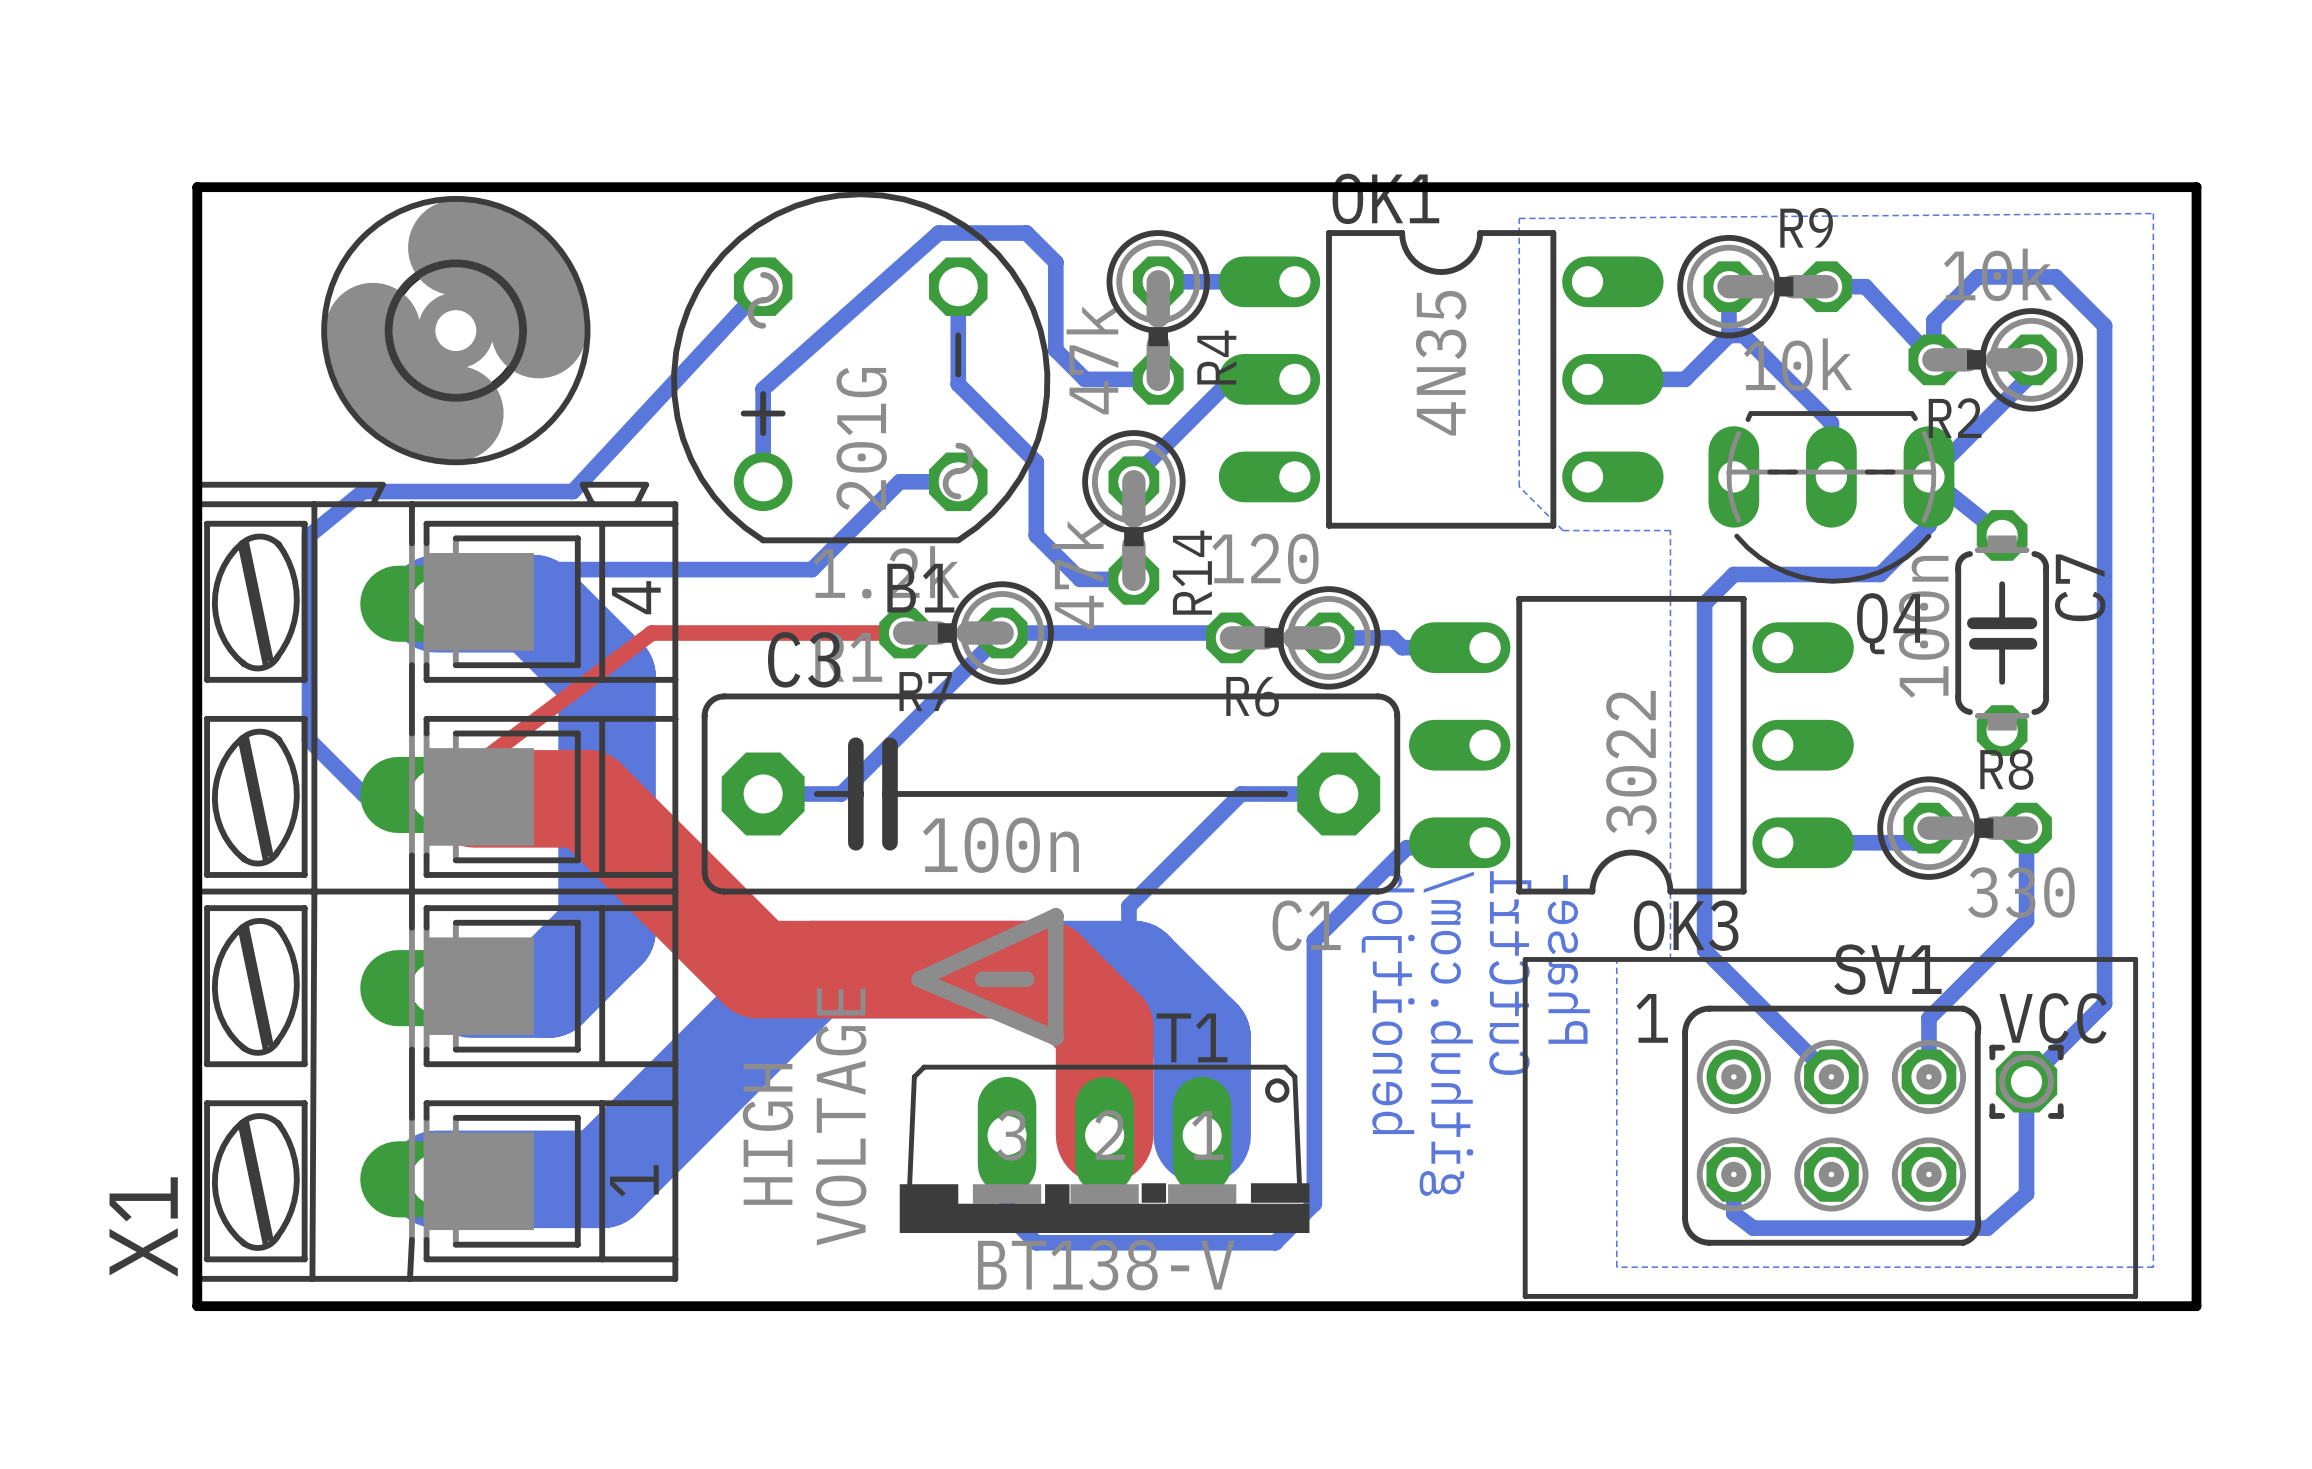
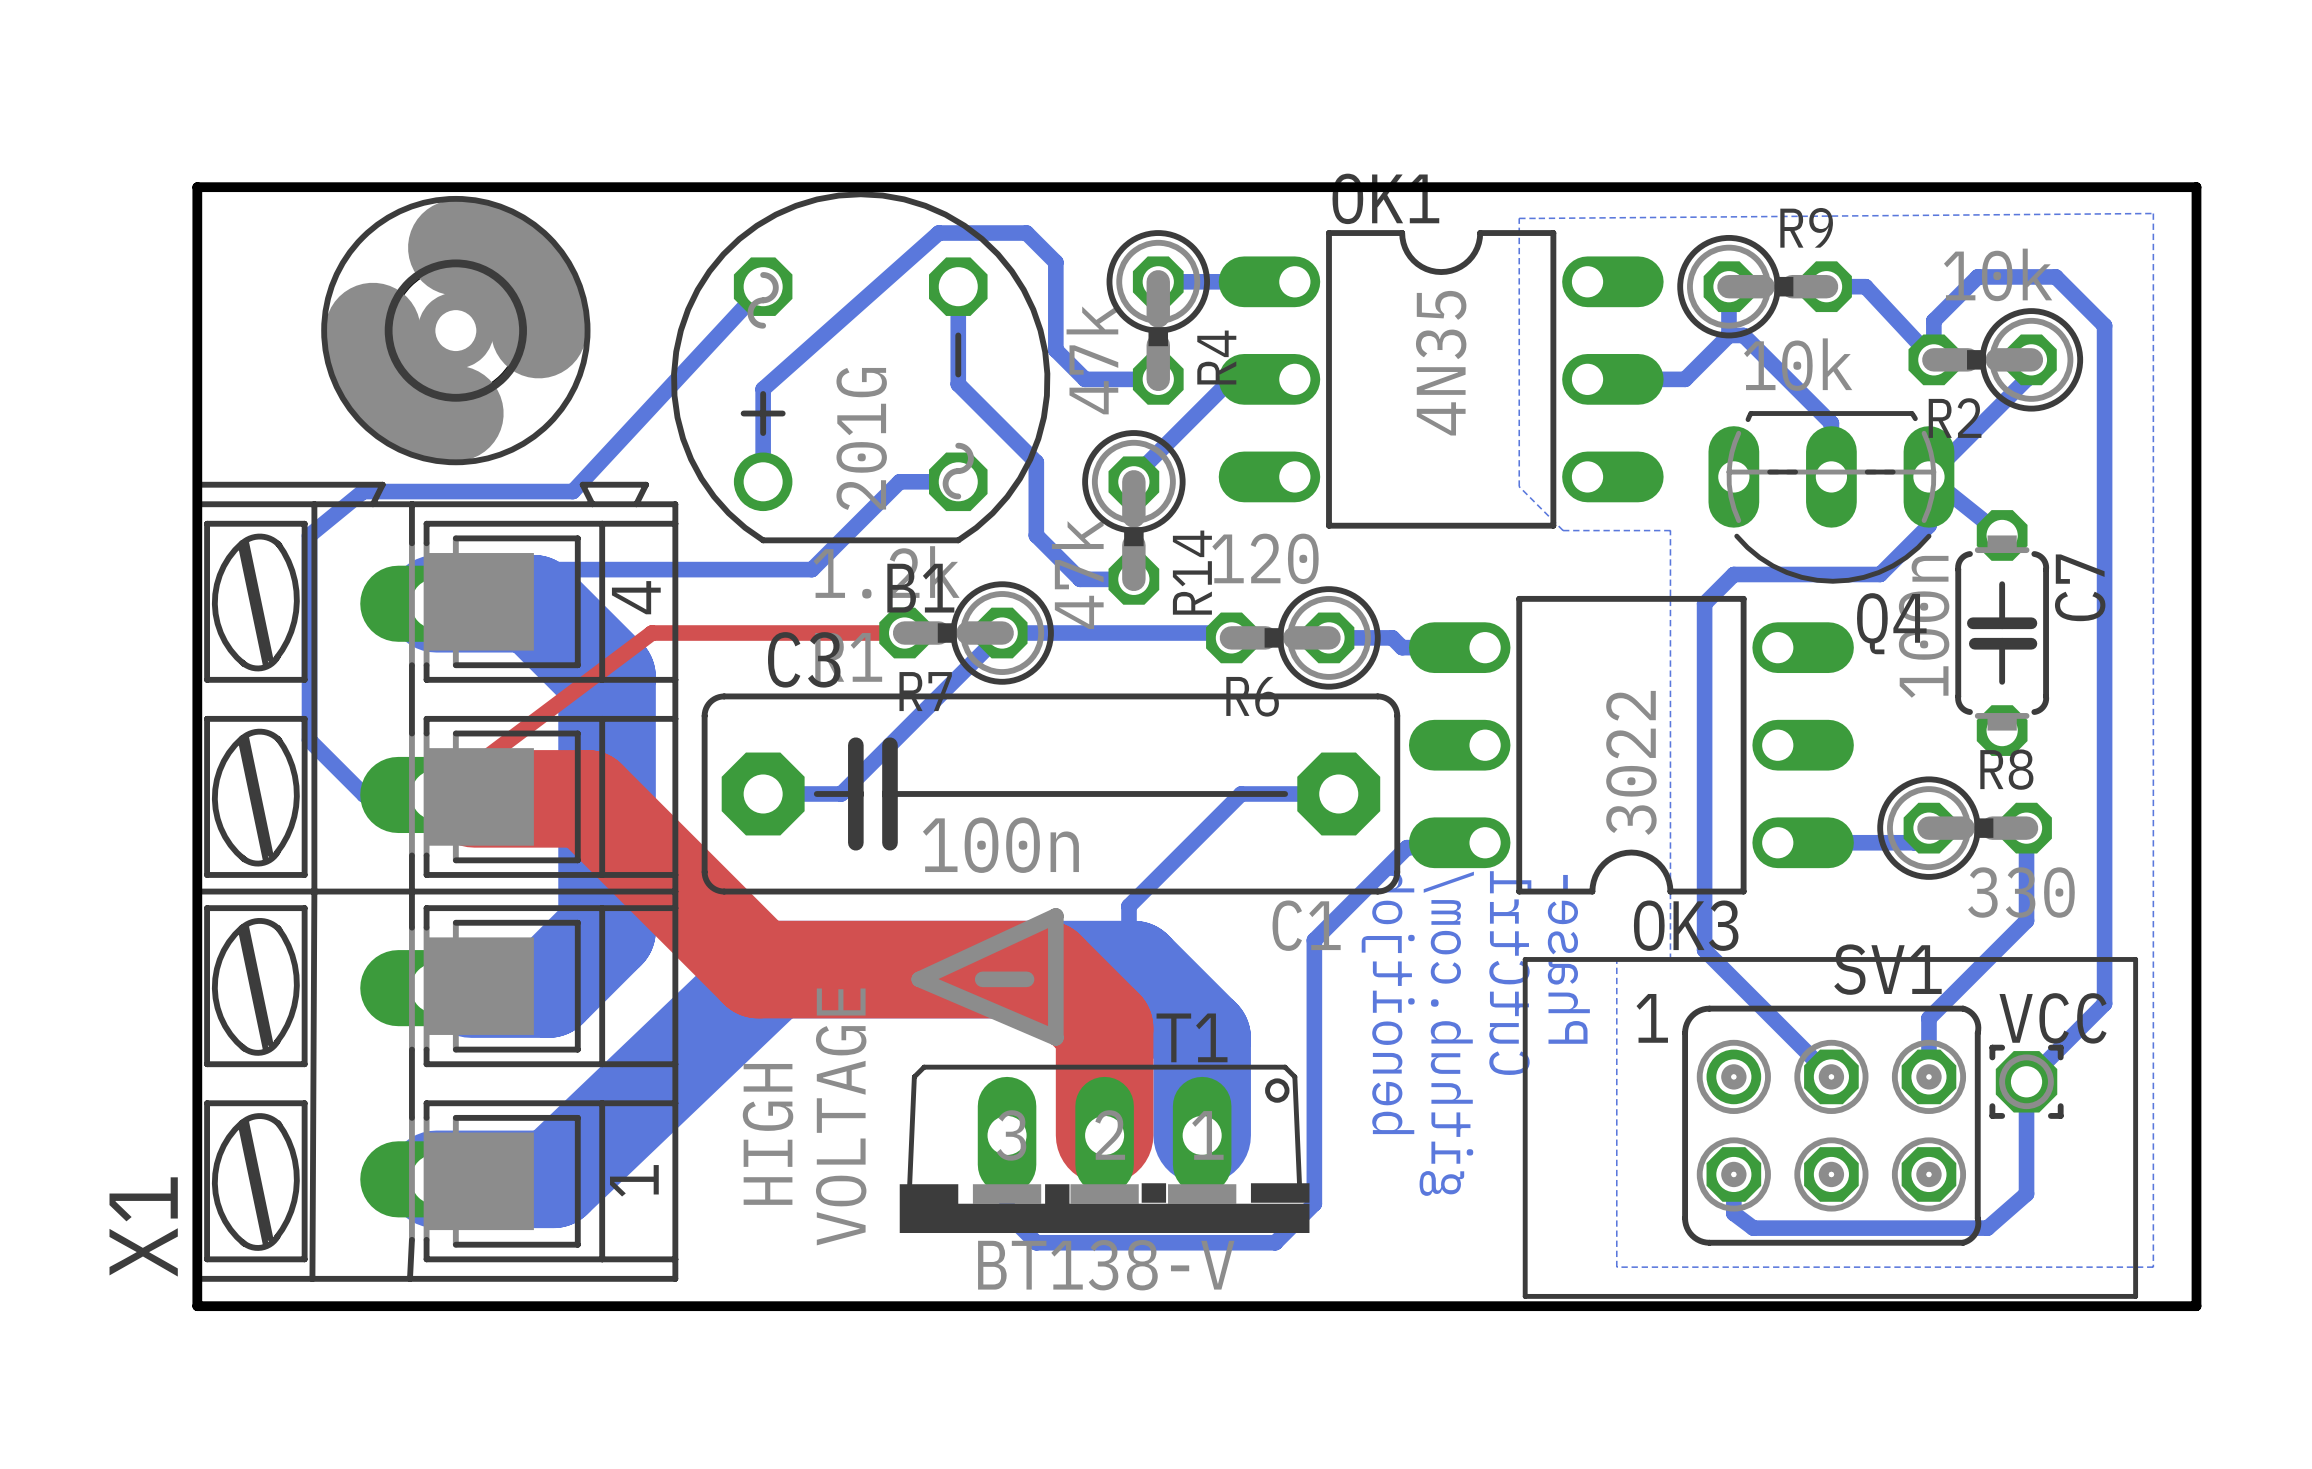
bottom track: (811, 969) (602, 1179) (553, 1179) -> (811, 969) (772, 969) (553, 1179)

